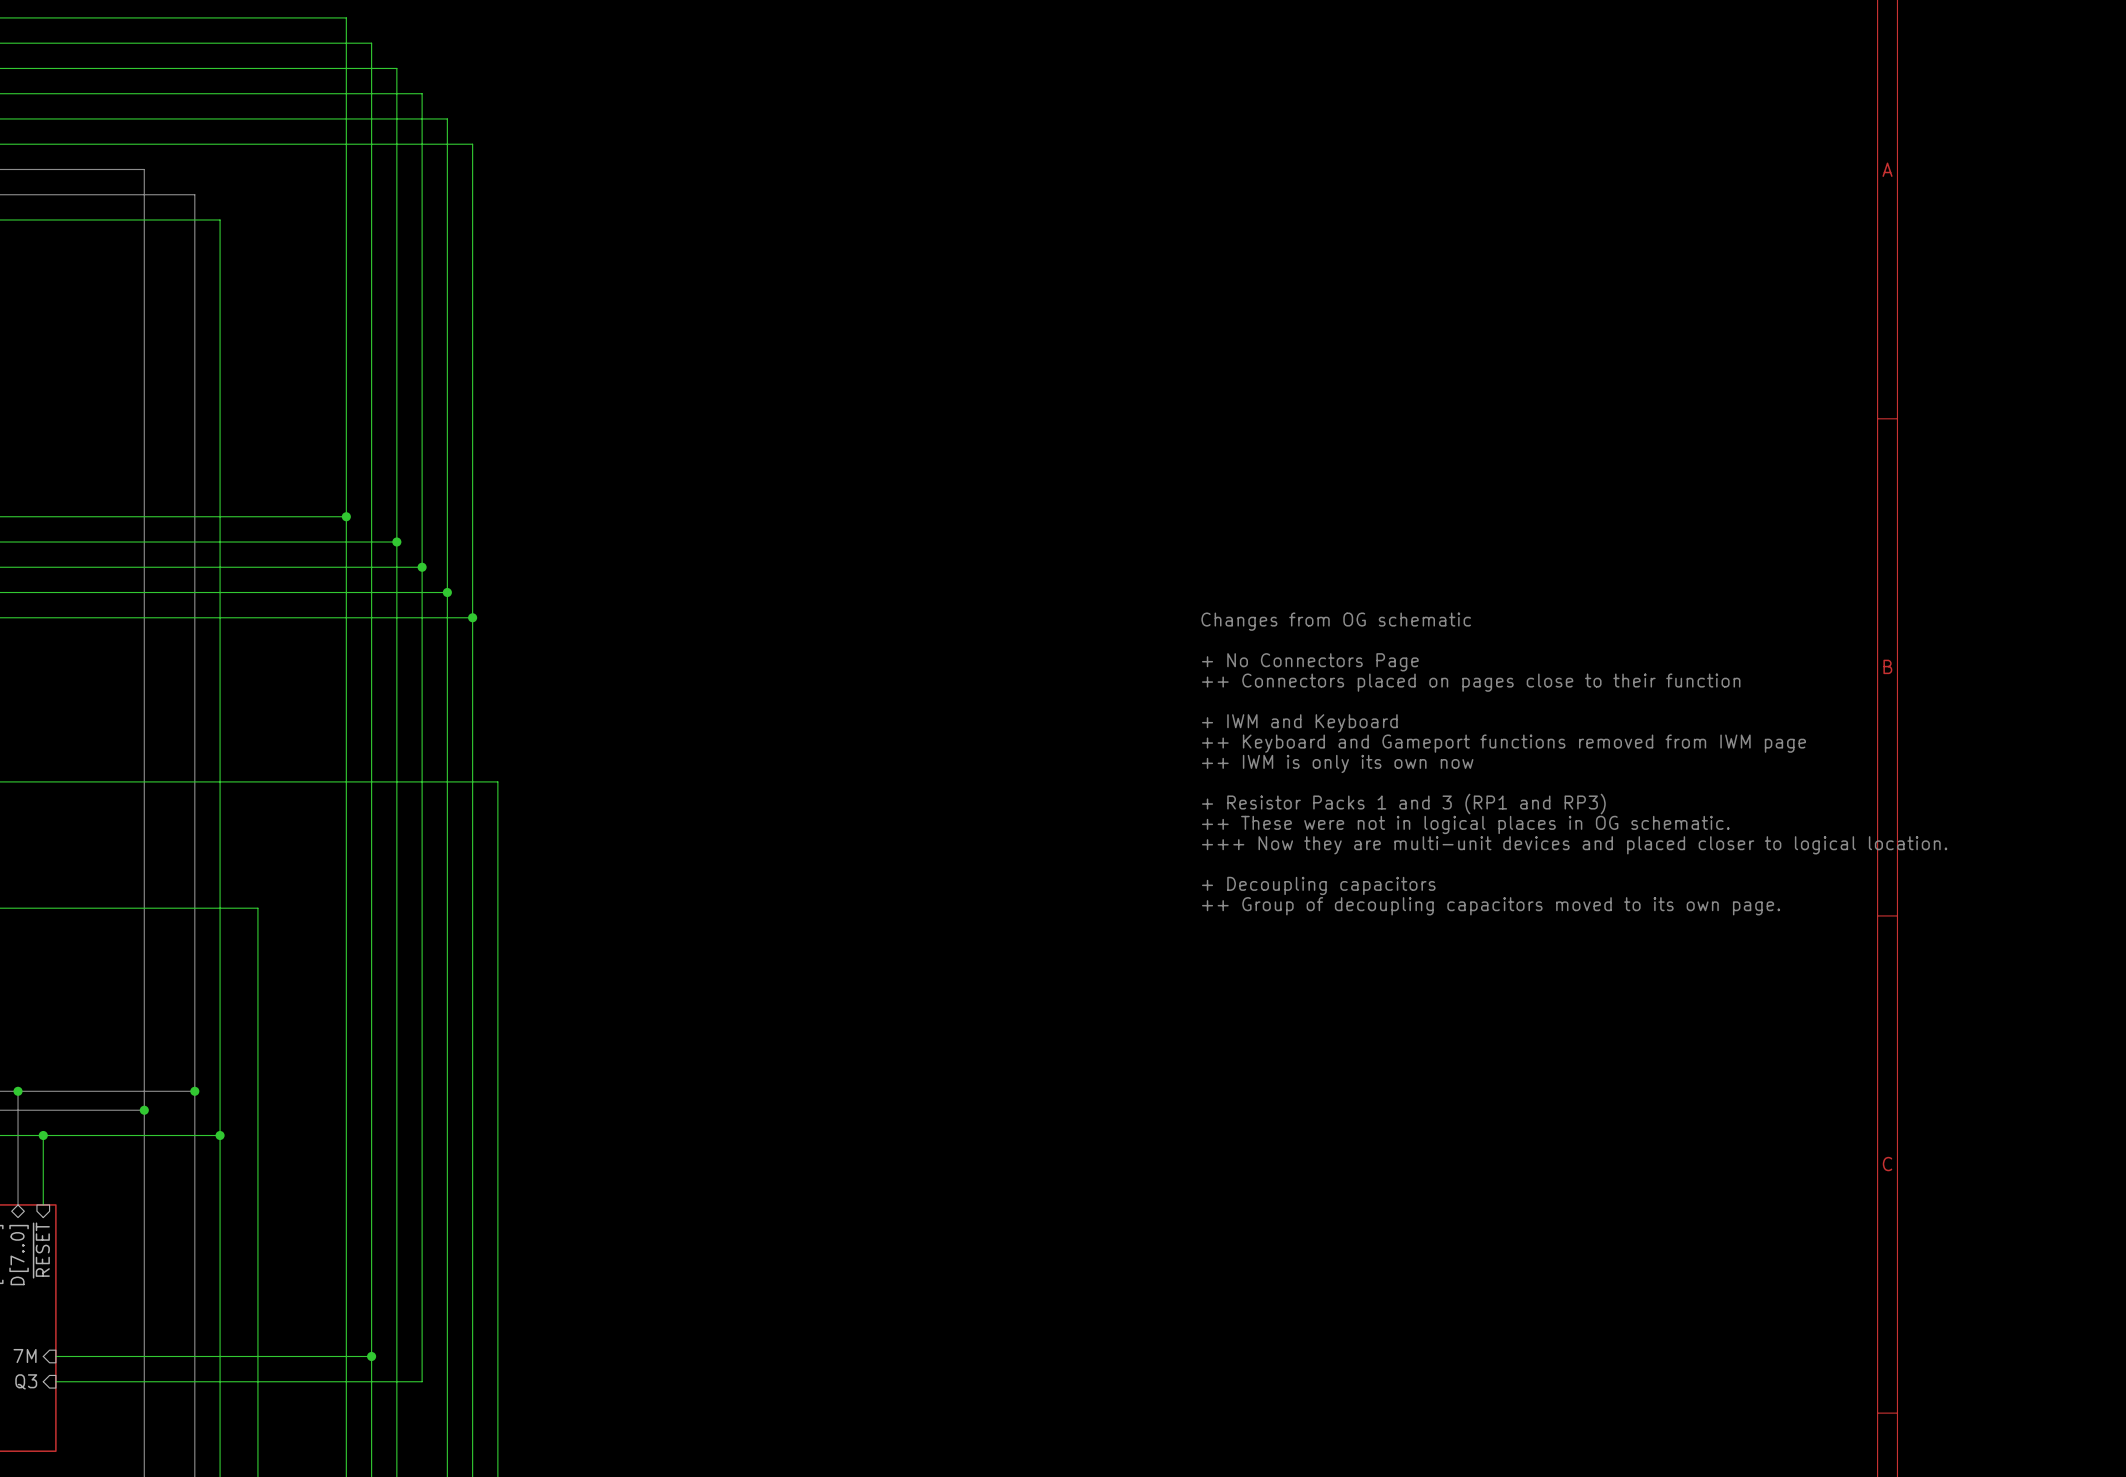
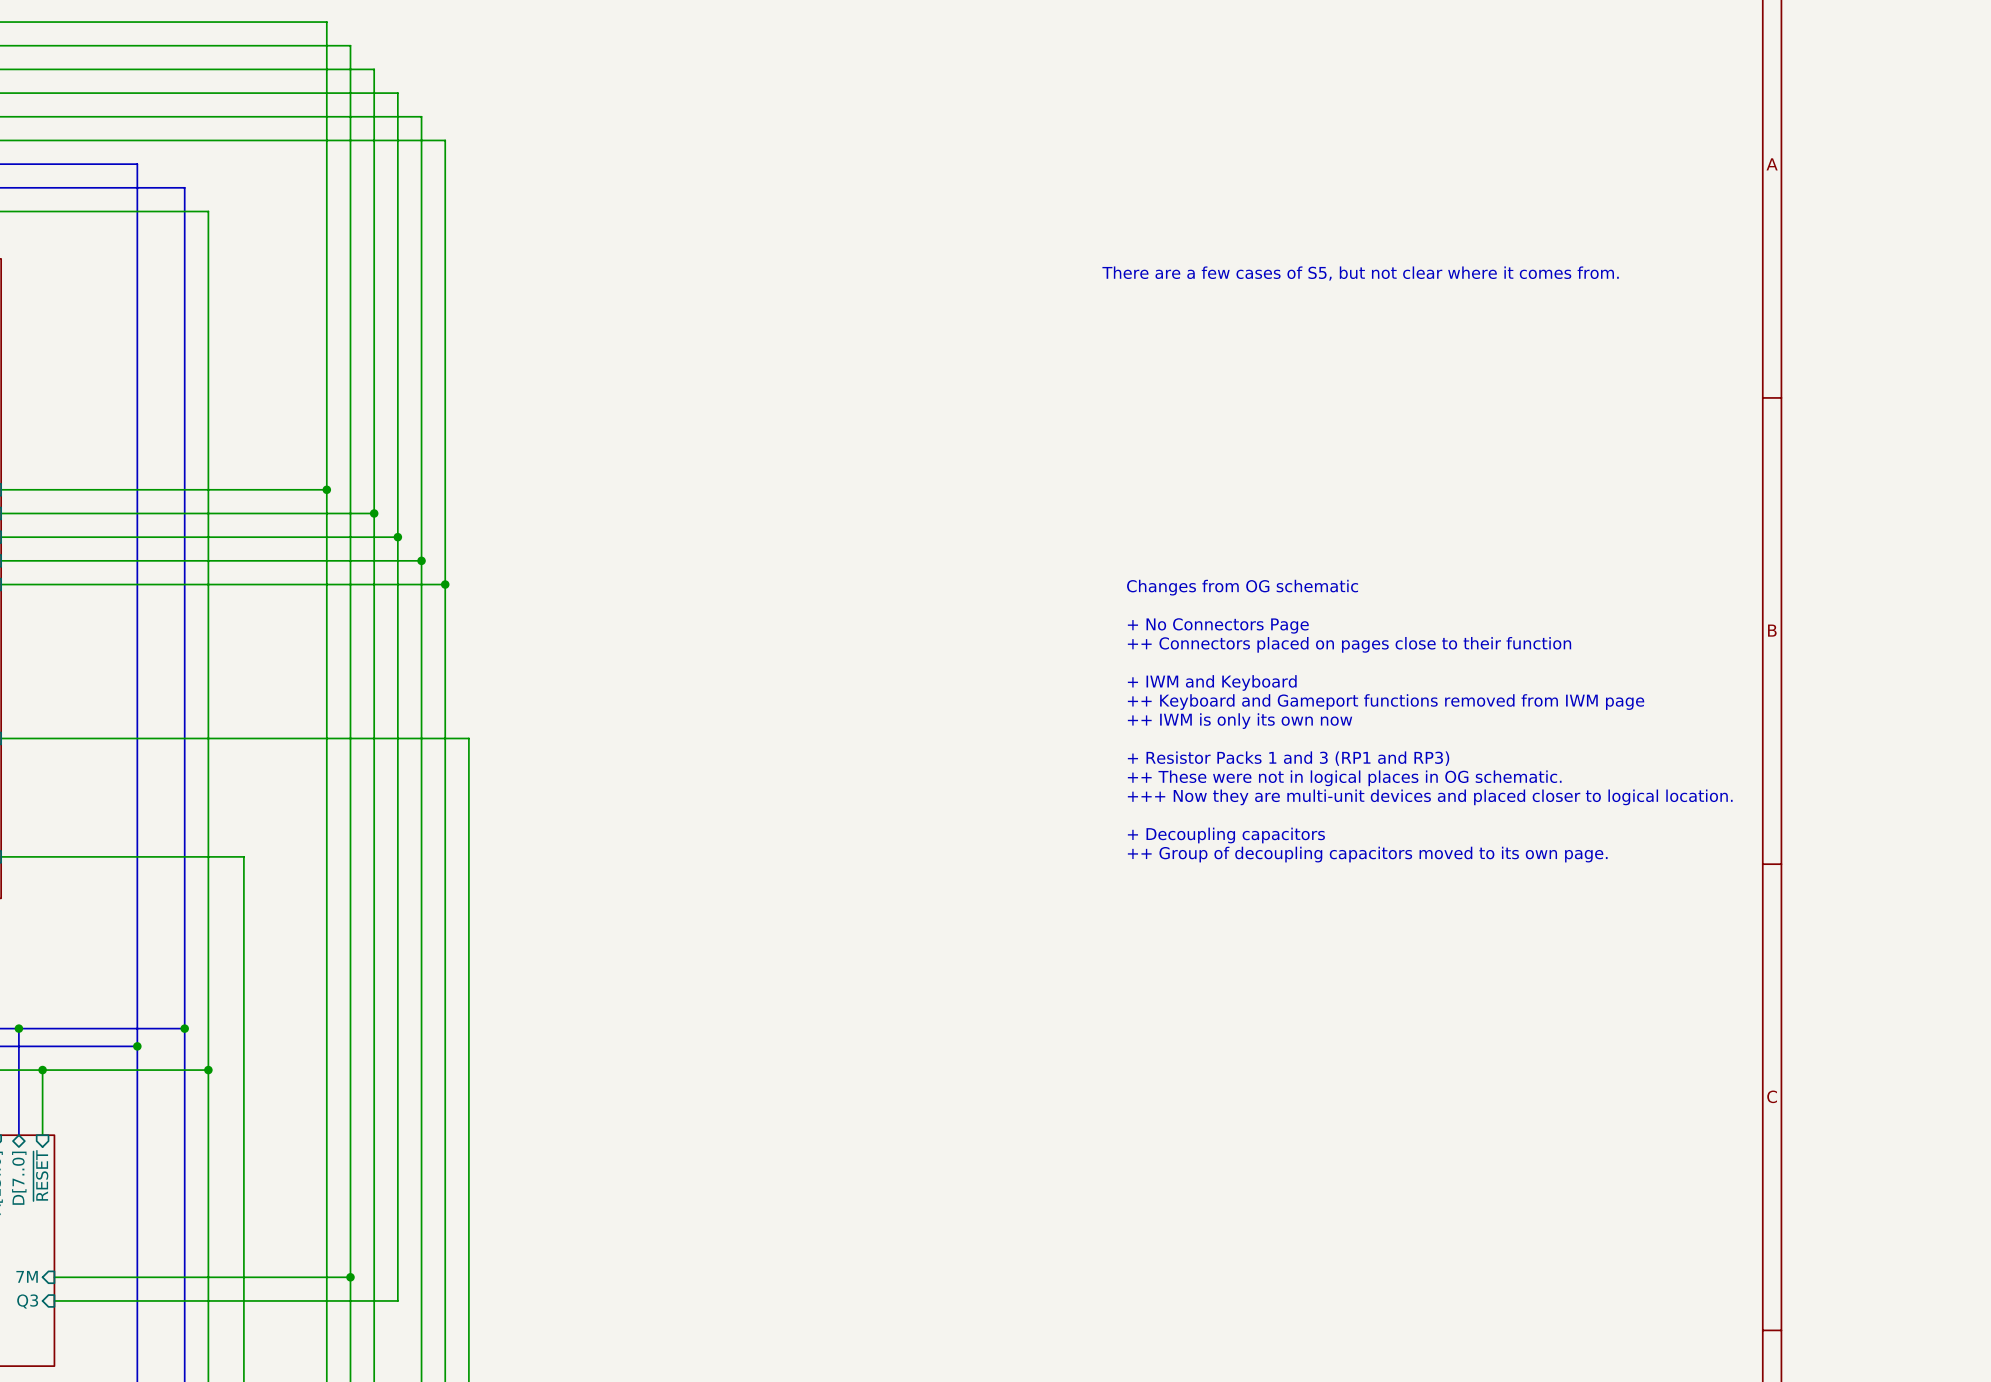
text: none -> There are a few cases of S5, but not clear where it comes from. (1360, 273)

